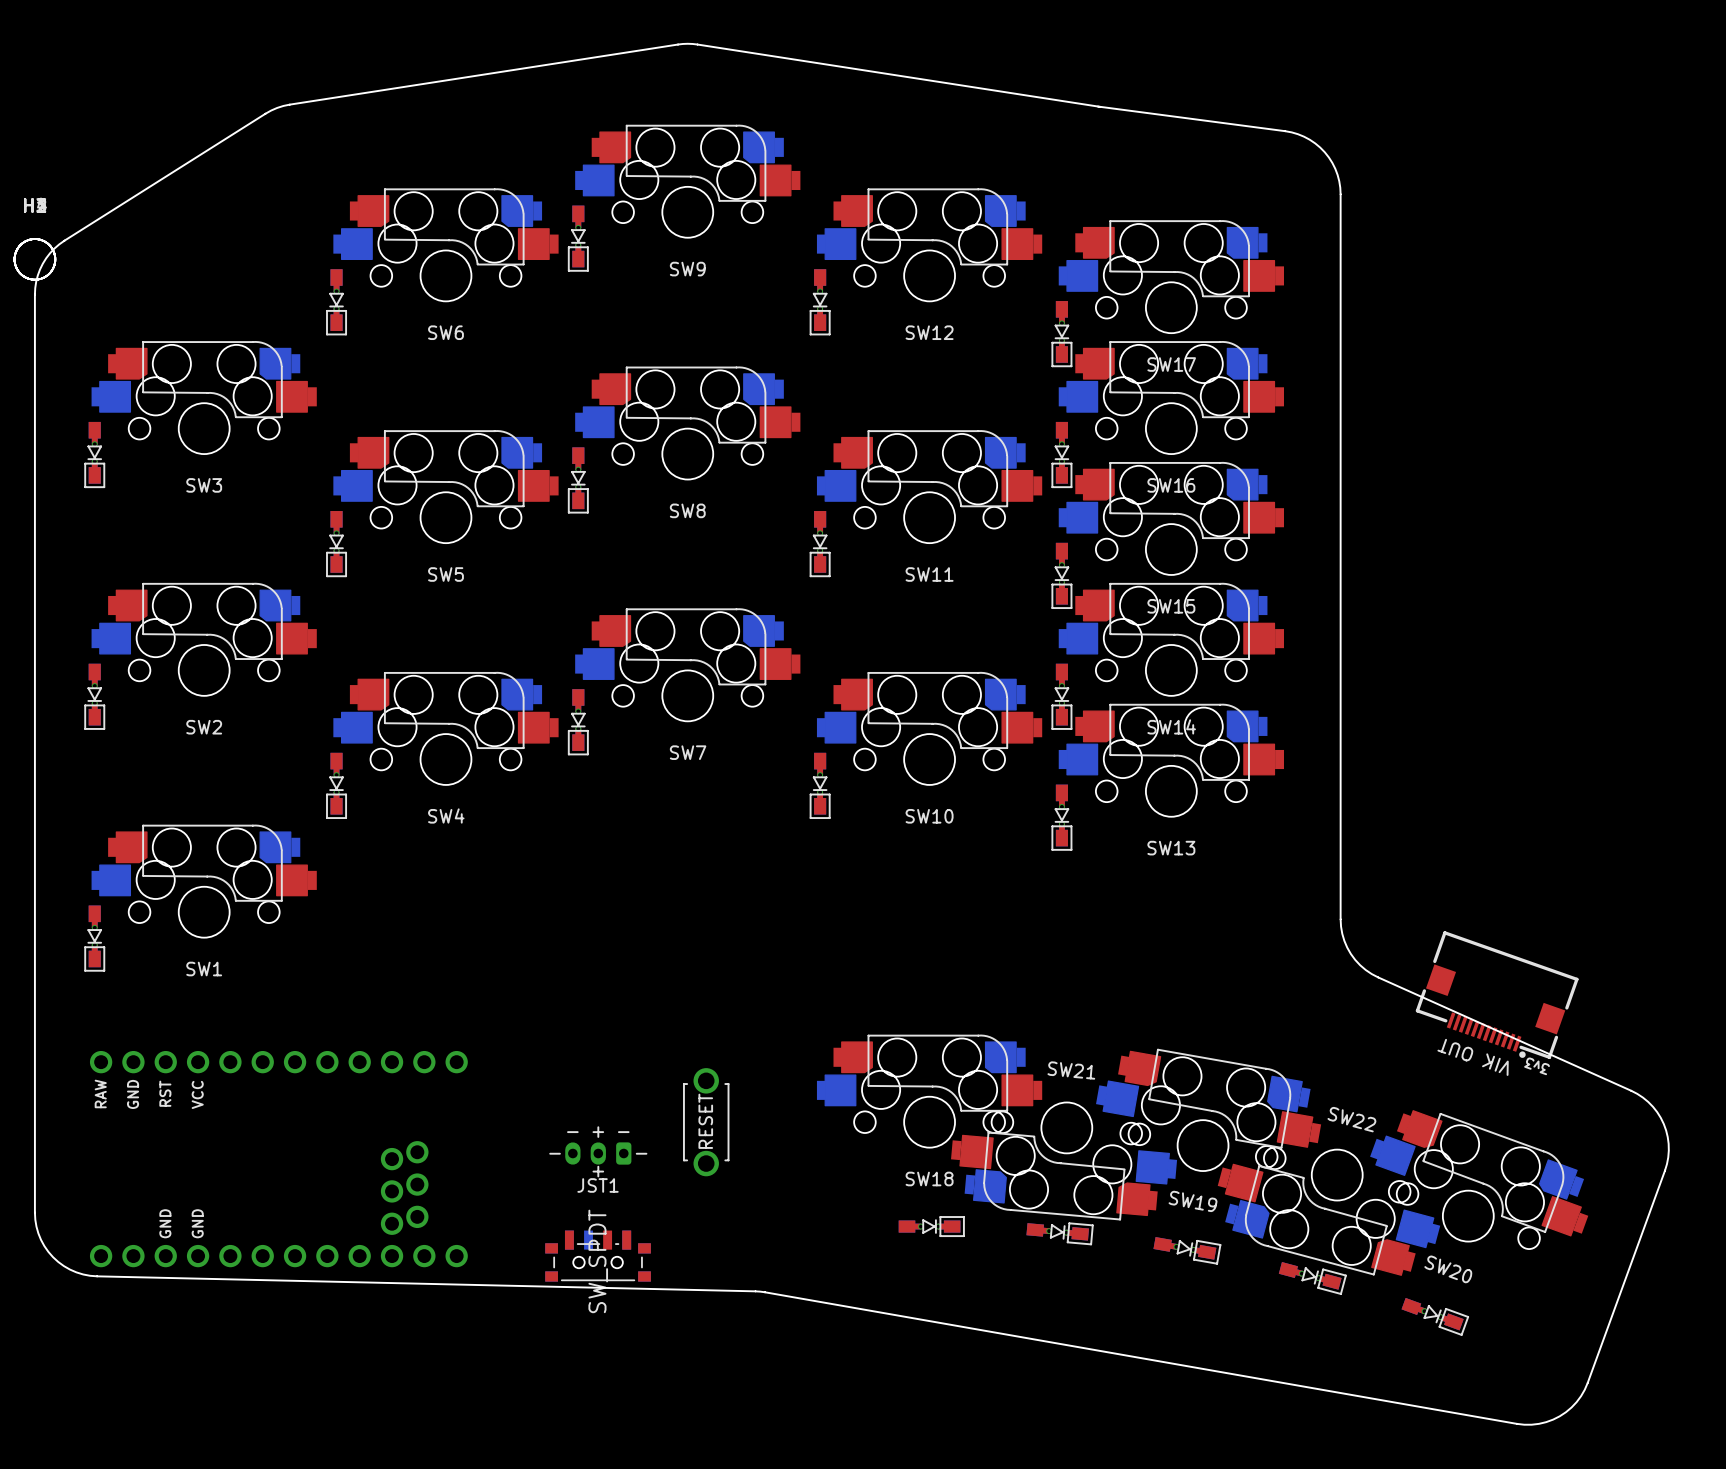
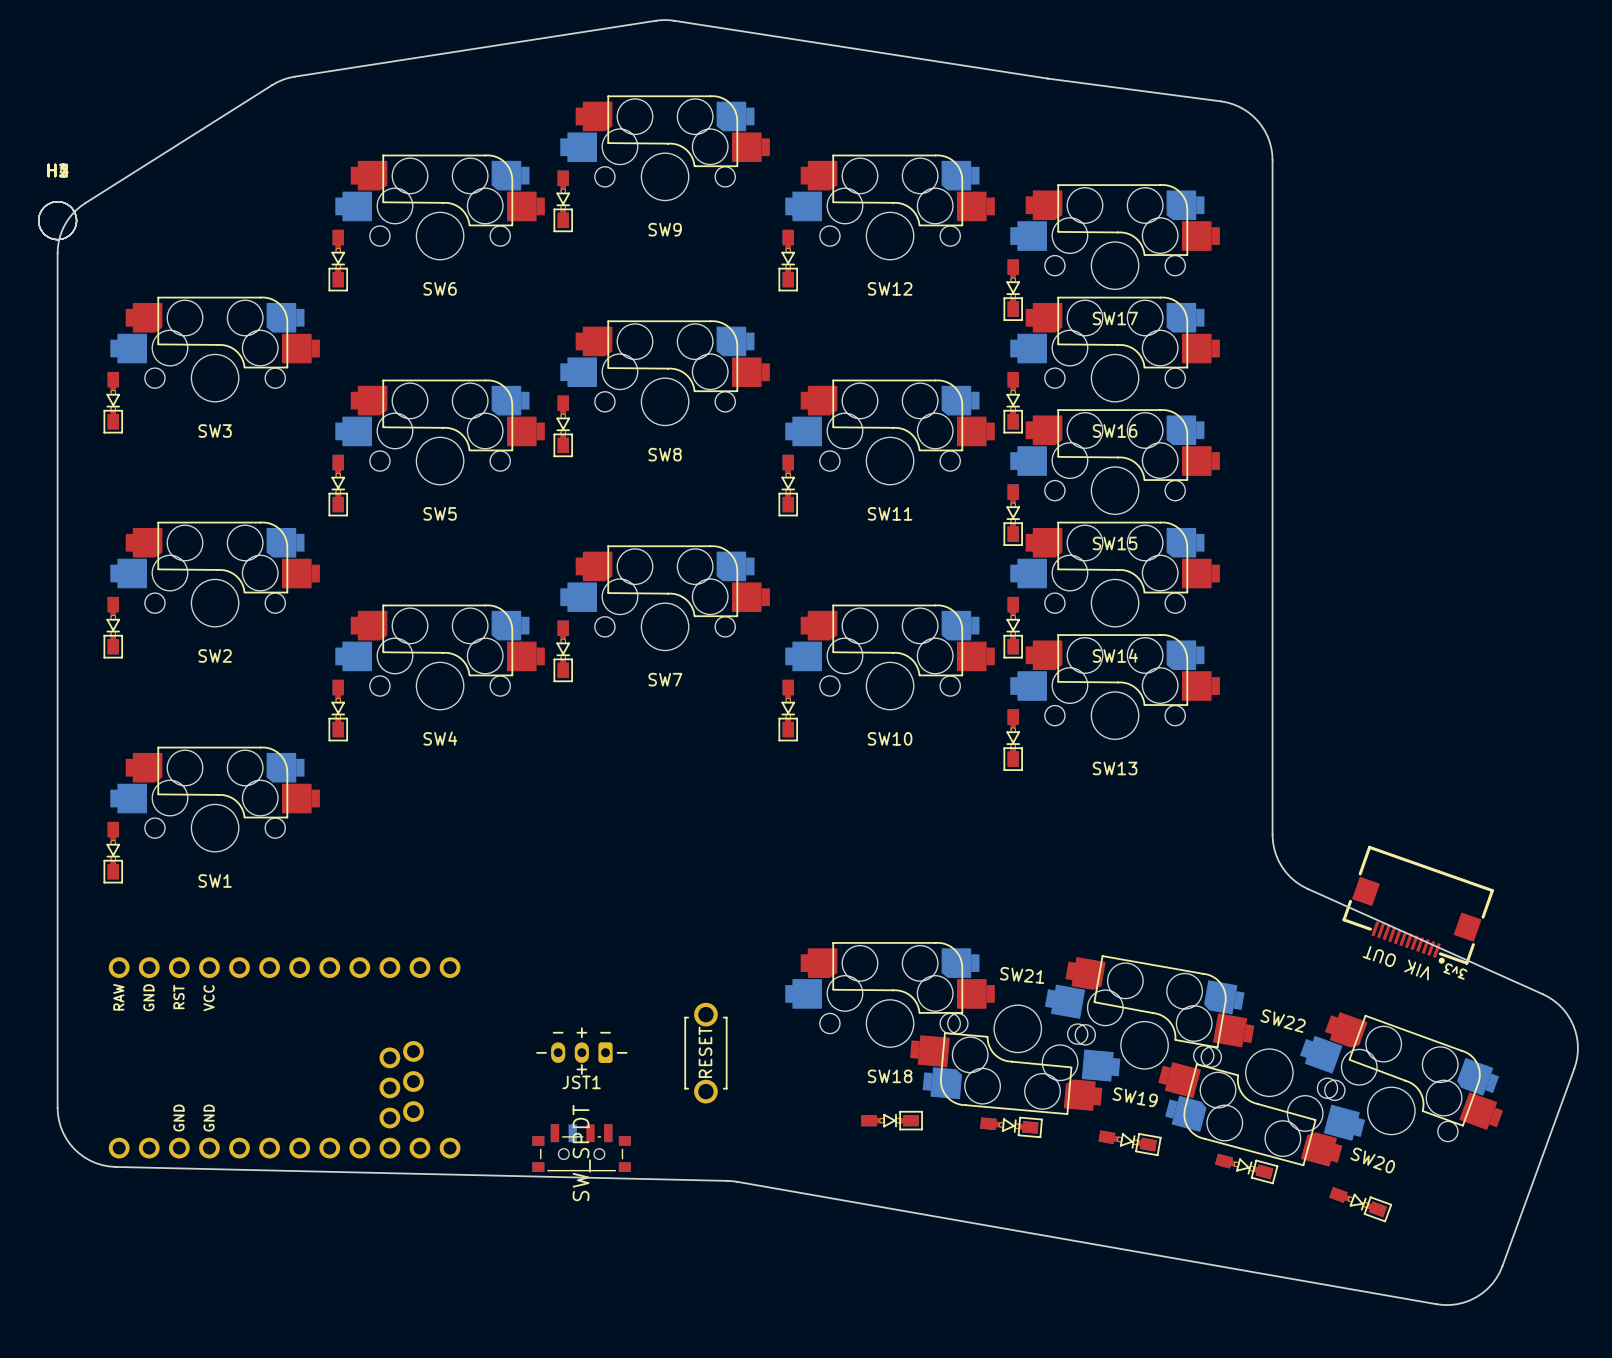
part position: (706, 1122) -> (705, 1053)

